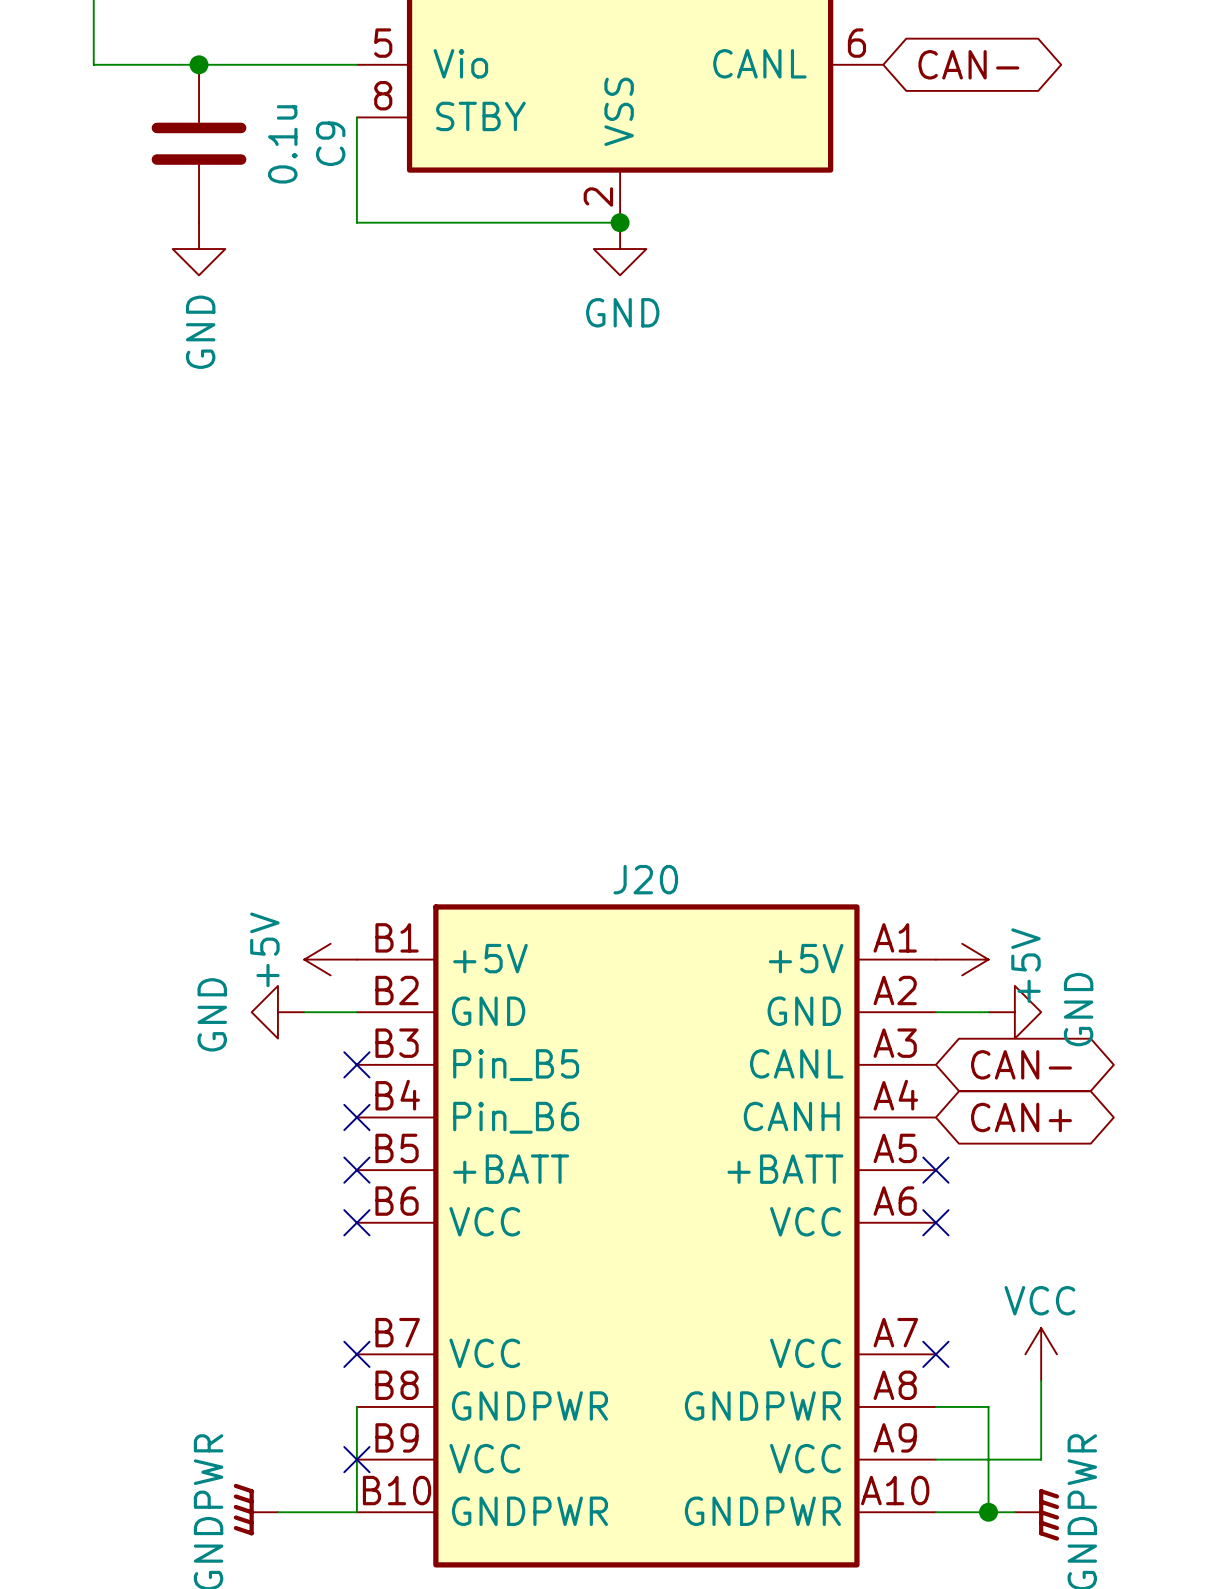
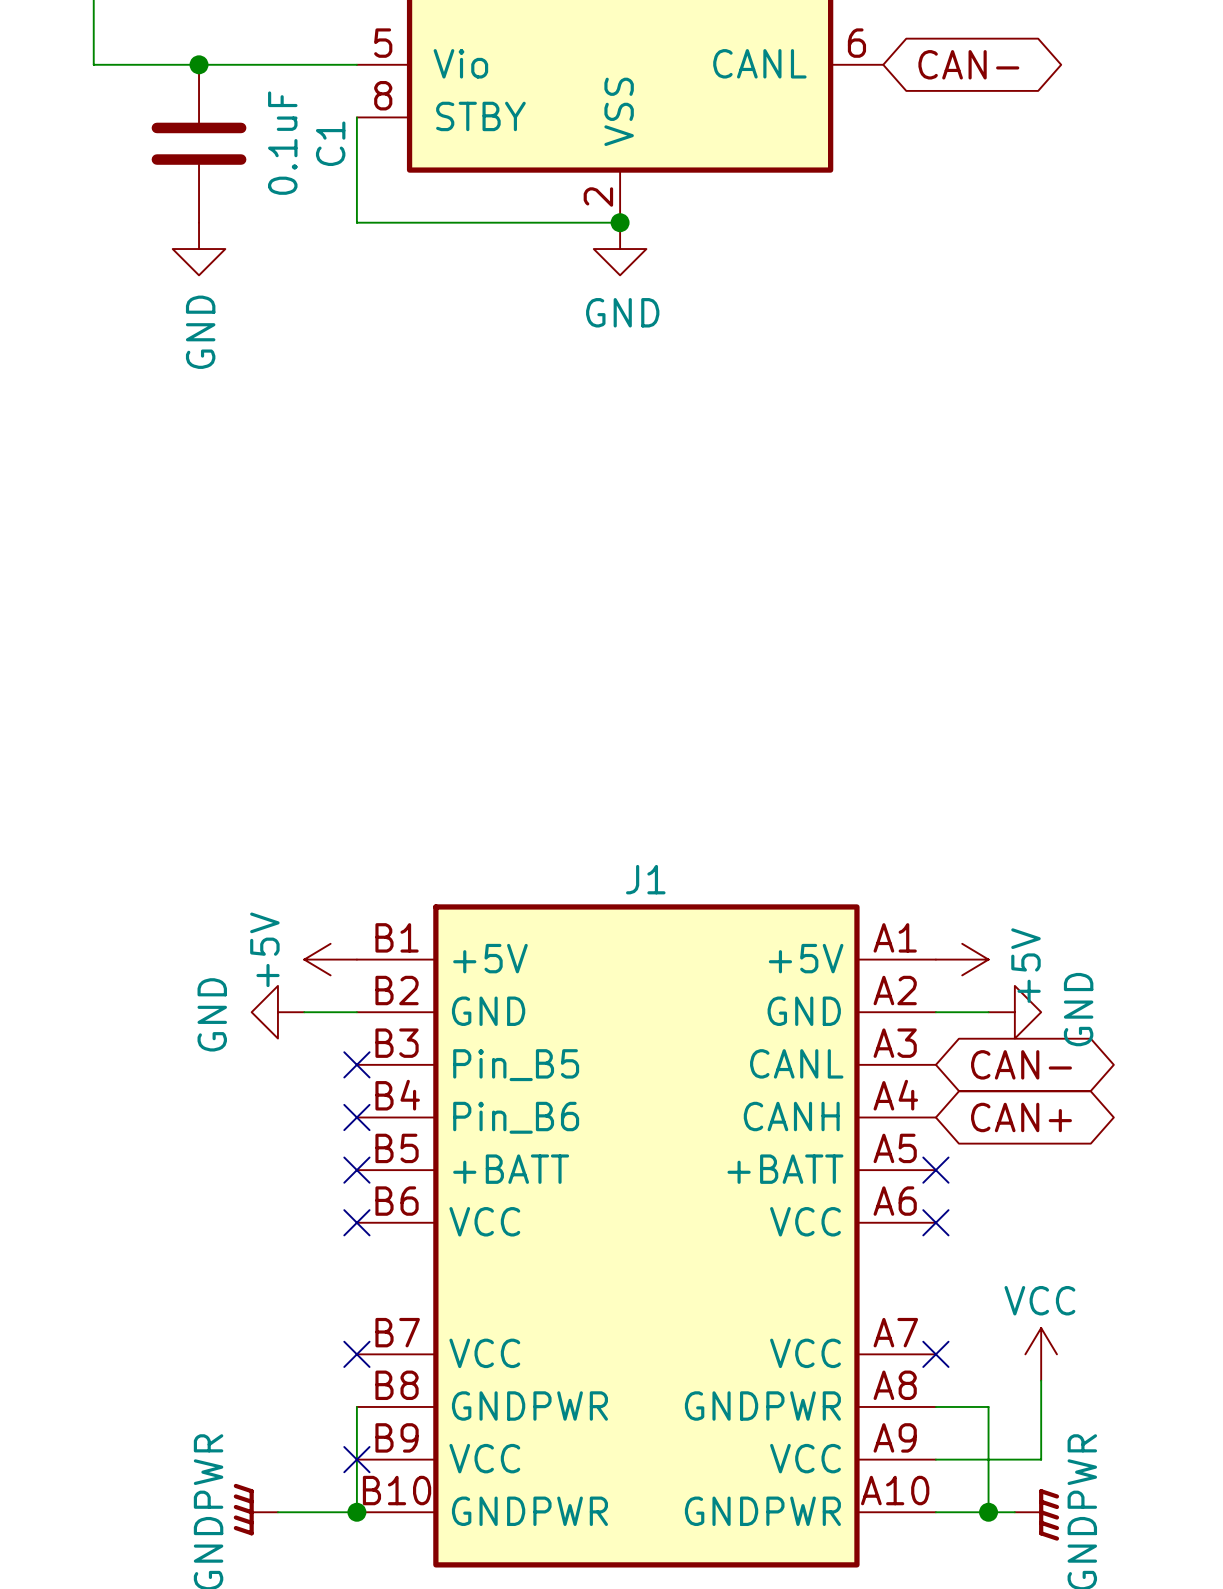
C9 name: C9 (330, 143) -> C1 (330, 143)
C9 value: 0.1u (282, 144) -> 0.1uF (282, 143)
J20 name: J20 (645, 879) -> J1 (645, 879)
junction: none -> (356, 1512)

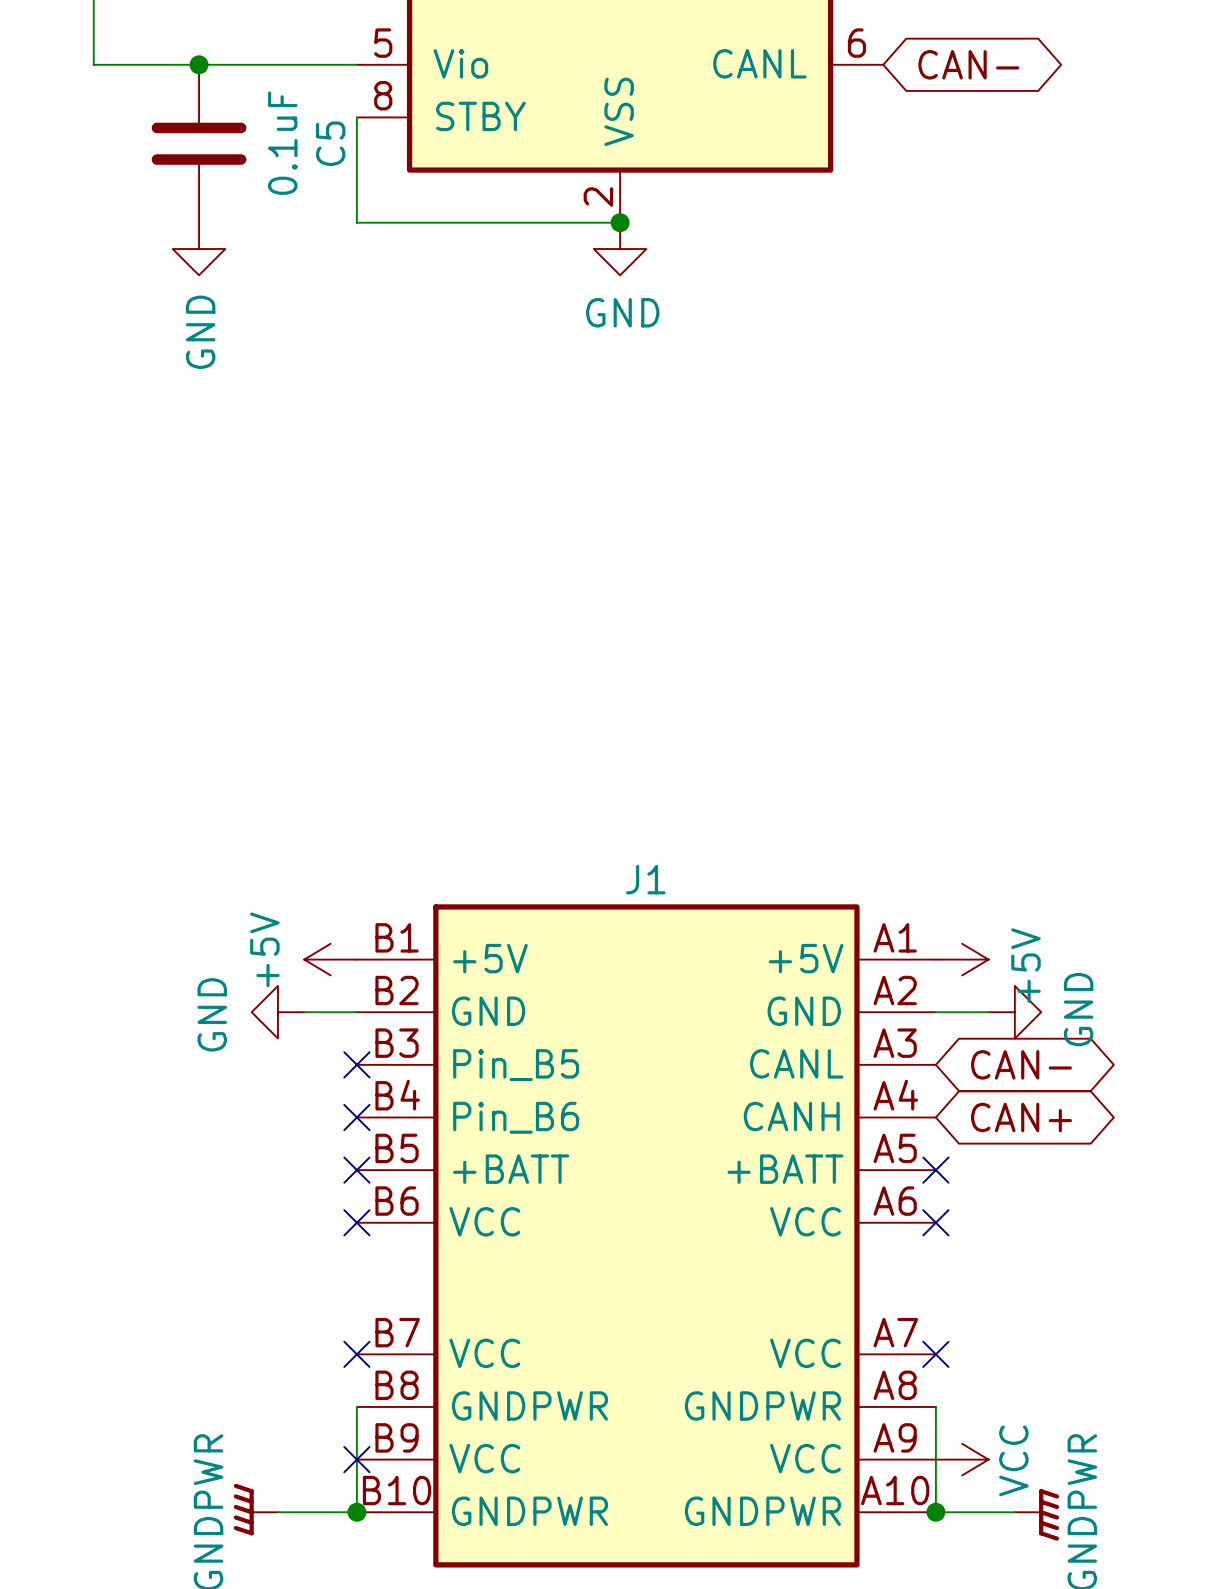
C1 name: C1 (330, 143) -> C5 (330, 143)
power symbol rotation: 0° (1041, 1354) -> 90° clockwise (962, 1459)
power symbol position: VCC (1041, 1354) -> VCC (962, 1459)
wire: (1041, 1380) (1041, 1459) (935, 1459) -> none
wire: (935, 1406) (988, 1406) (988, 1512) -> (935, 1406) (935, 1512)
junction position: (988, 1512) -> (935, 1512)

